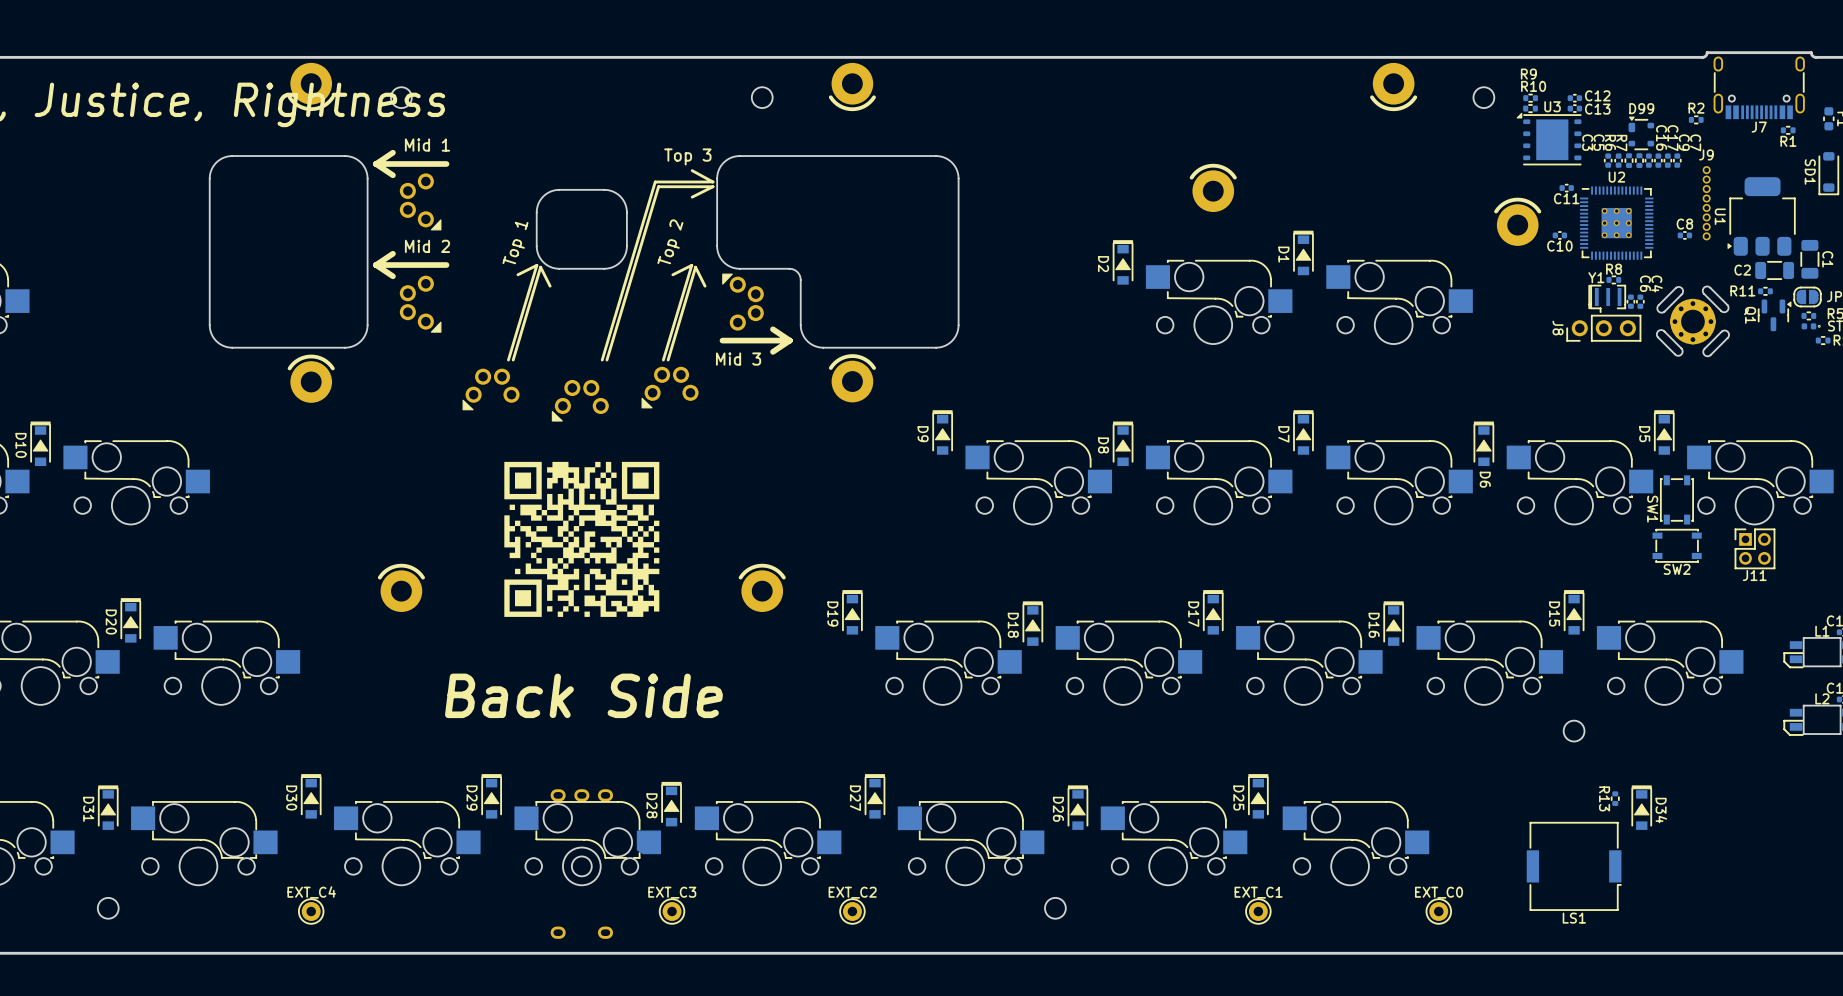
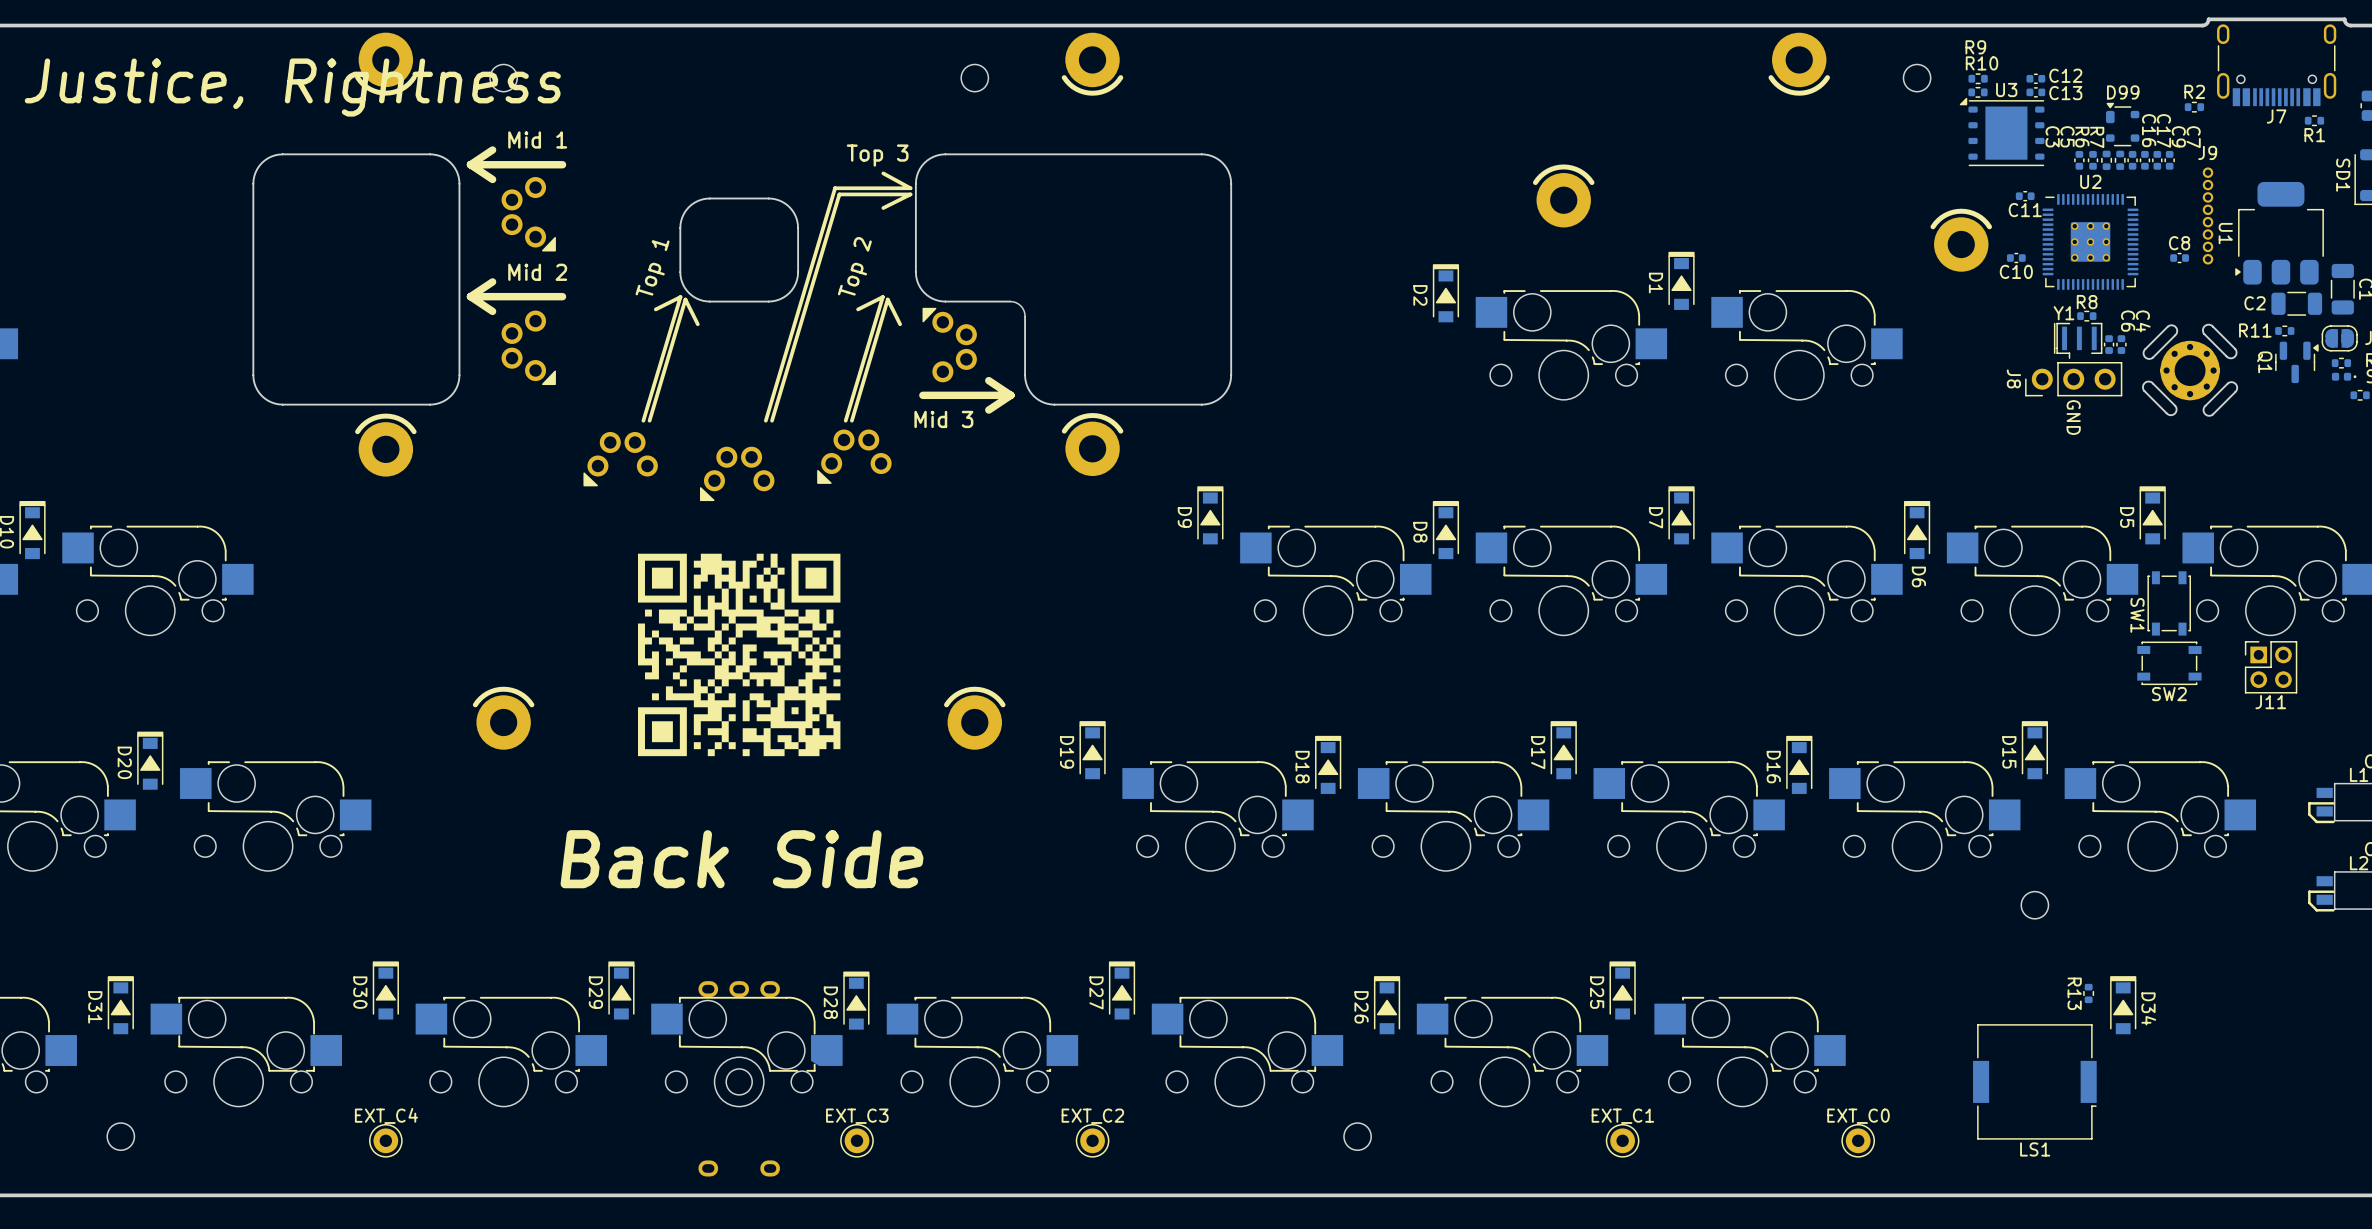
J8 text: none -> GND (2073, 417)

